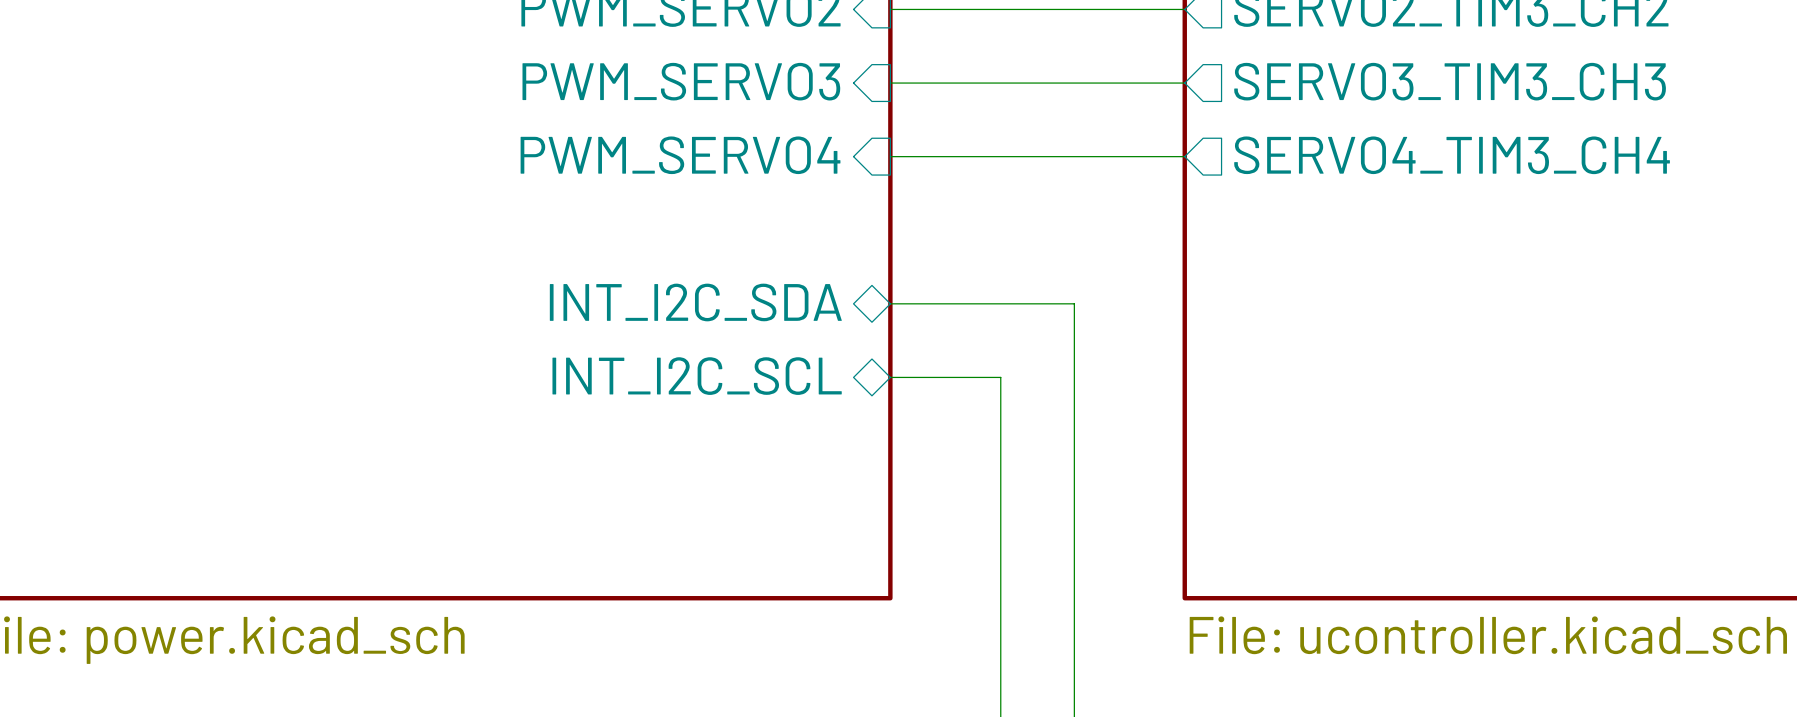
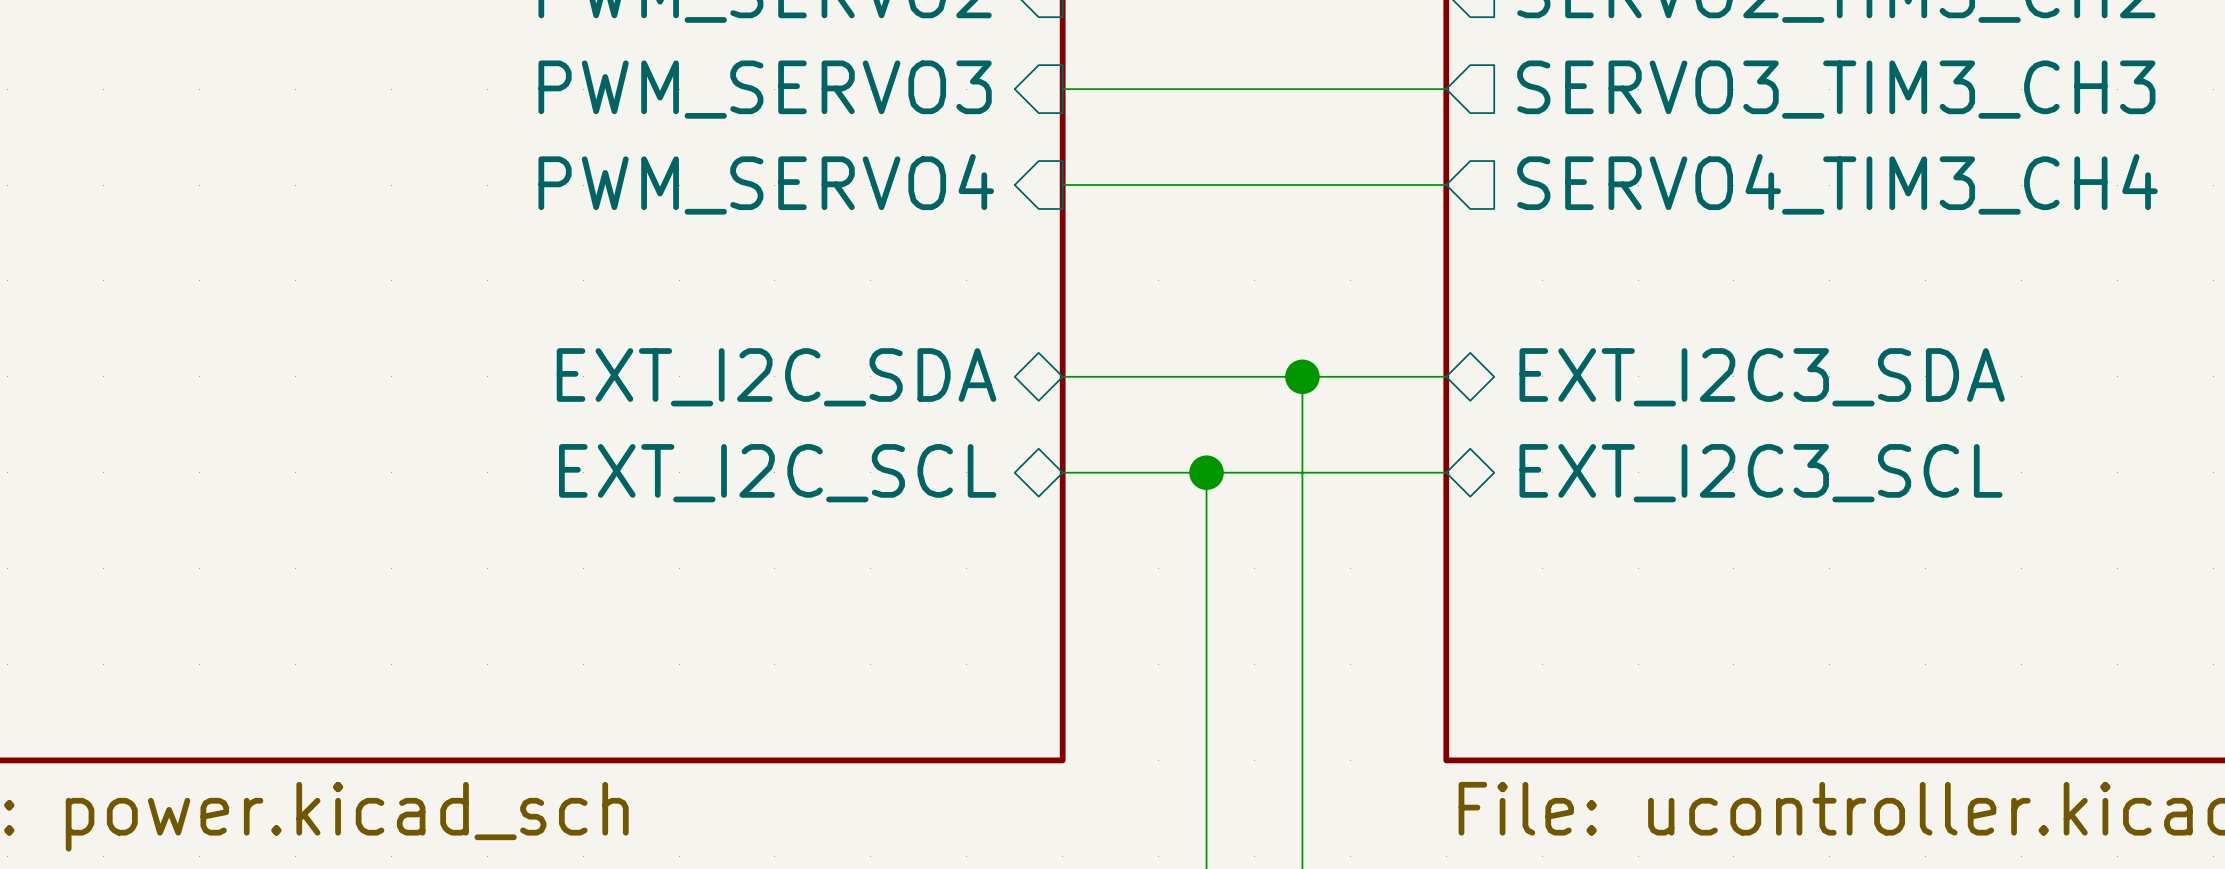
sheet pin: INT_I2C_SDA (695, 302) -> EXT_I2C_SDA (776, 377)
sheet pin: none -> EXT_I2C3_SDA (1762, 377)
wire: none -> (1302, 376) (1446, 376)
junction: none -> (1302, 376)
sheet pin: INT_I2C_SCL (697, 376) -> EXT_I2C_SCL (777, 473)
sheet pin: none -> EXT_I2C3_SCL (1760, 473)
wire: none -> (1206, 472) (1446, 472)
junction: none -> (1206, 472)

